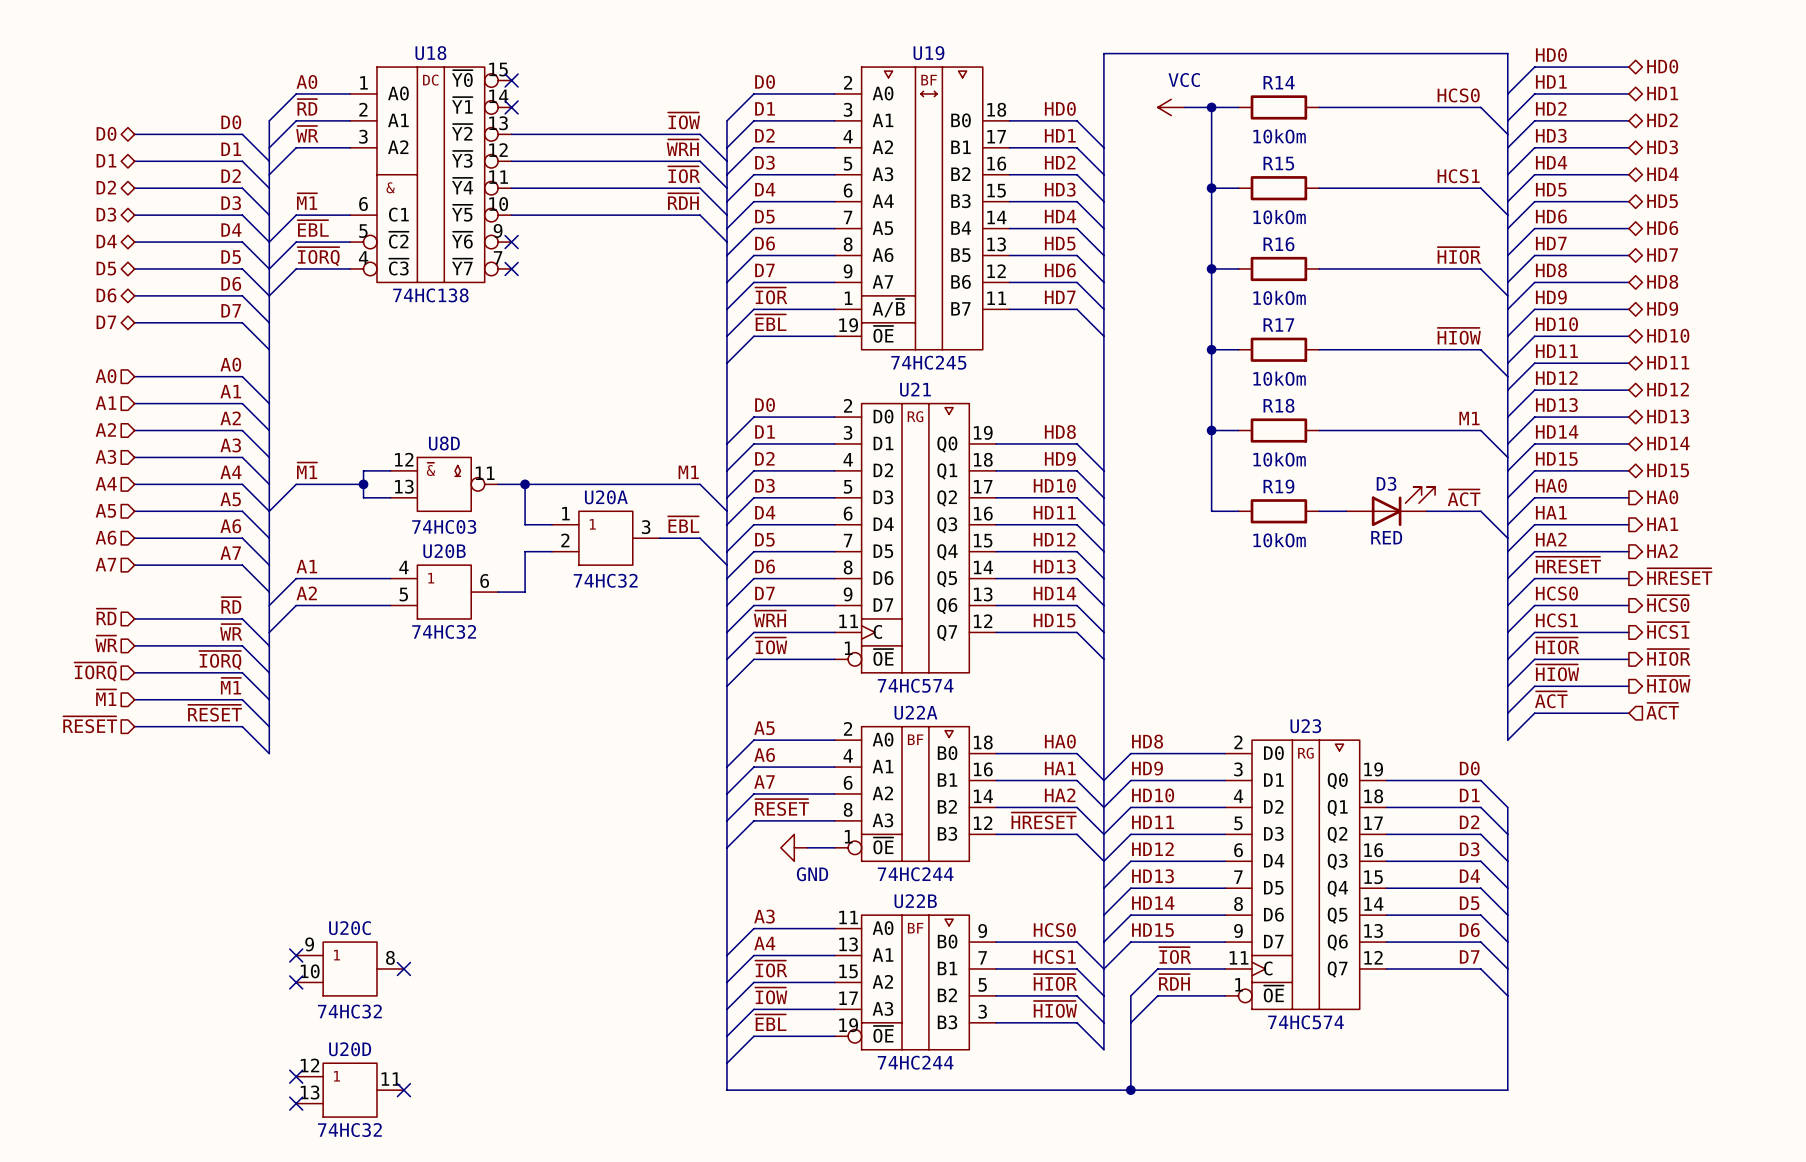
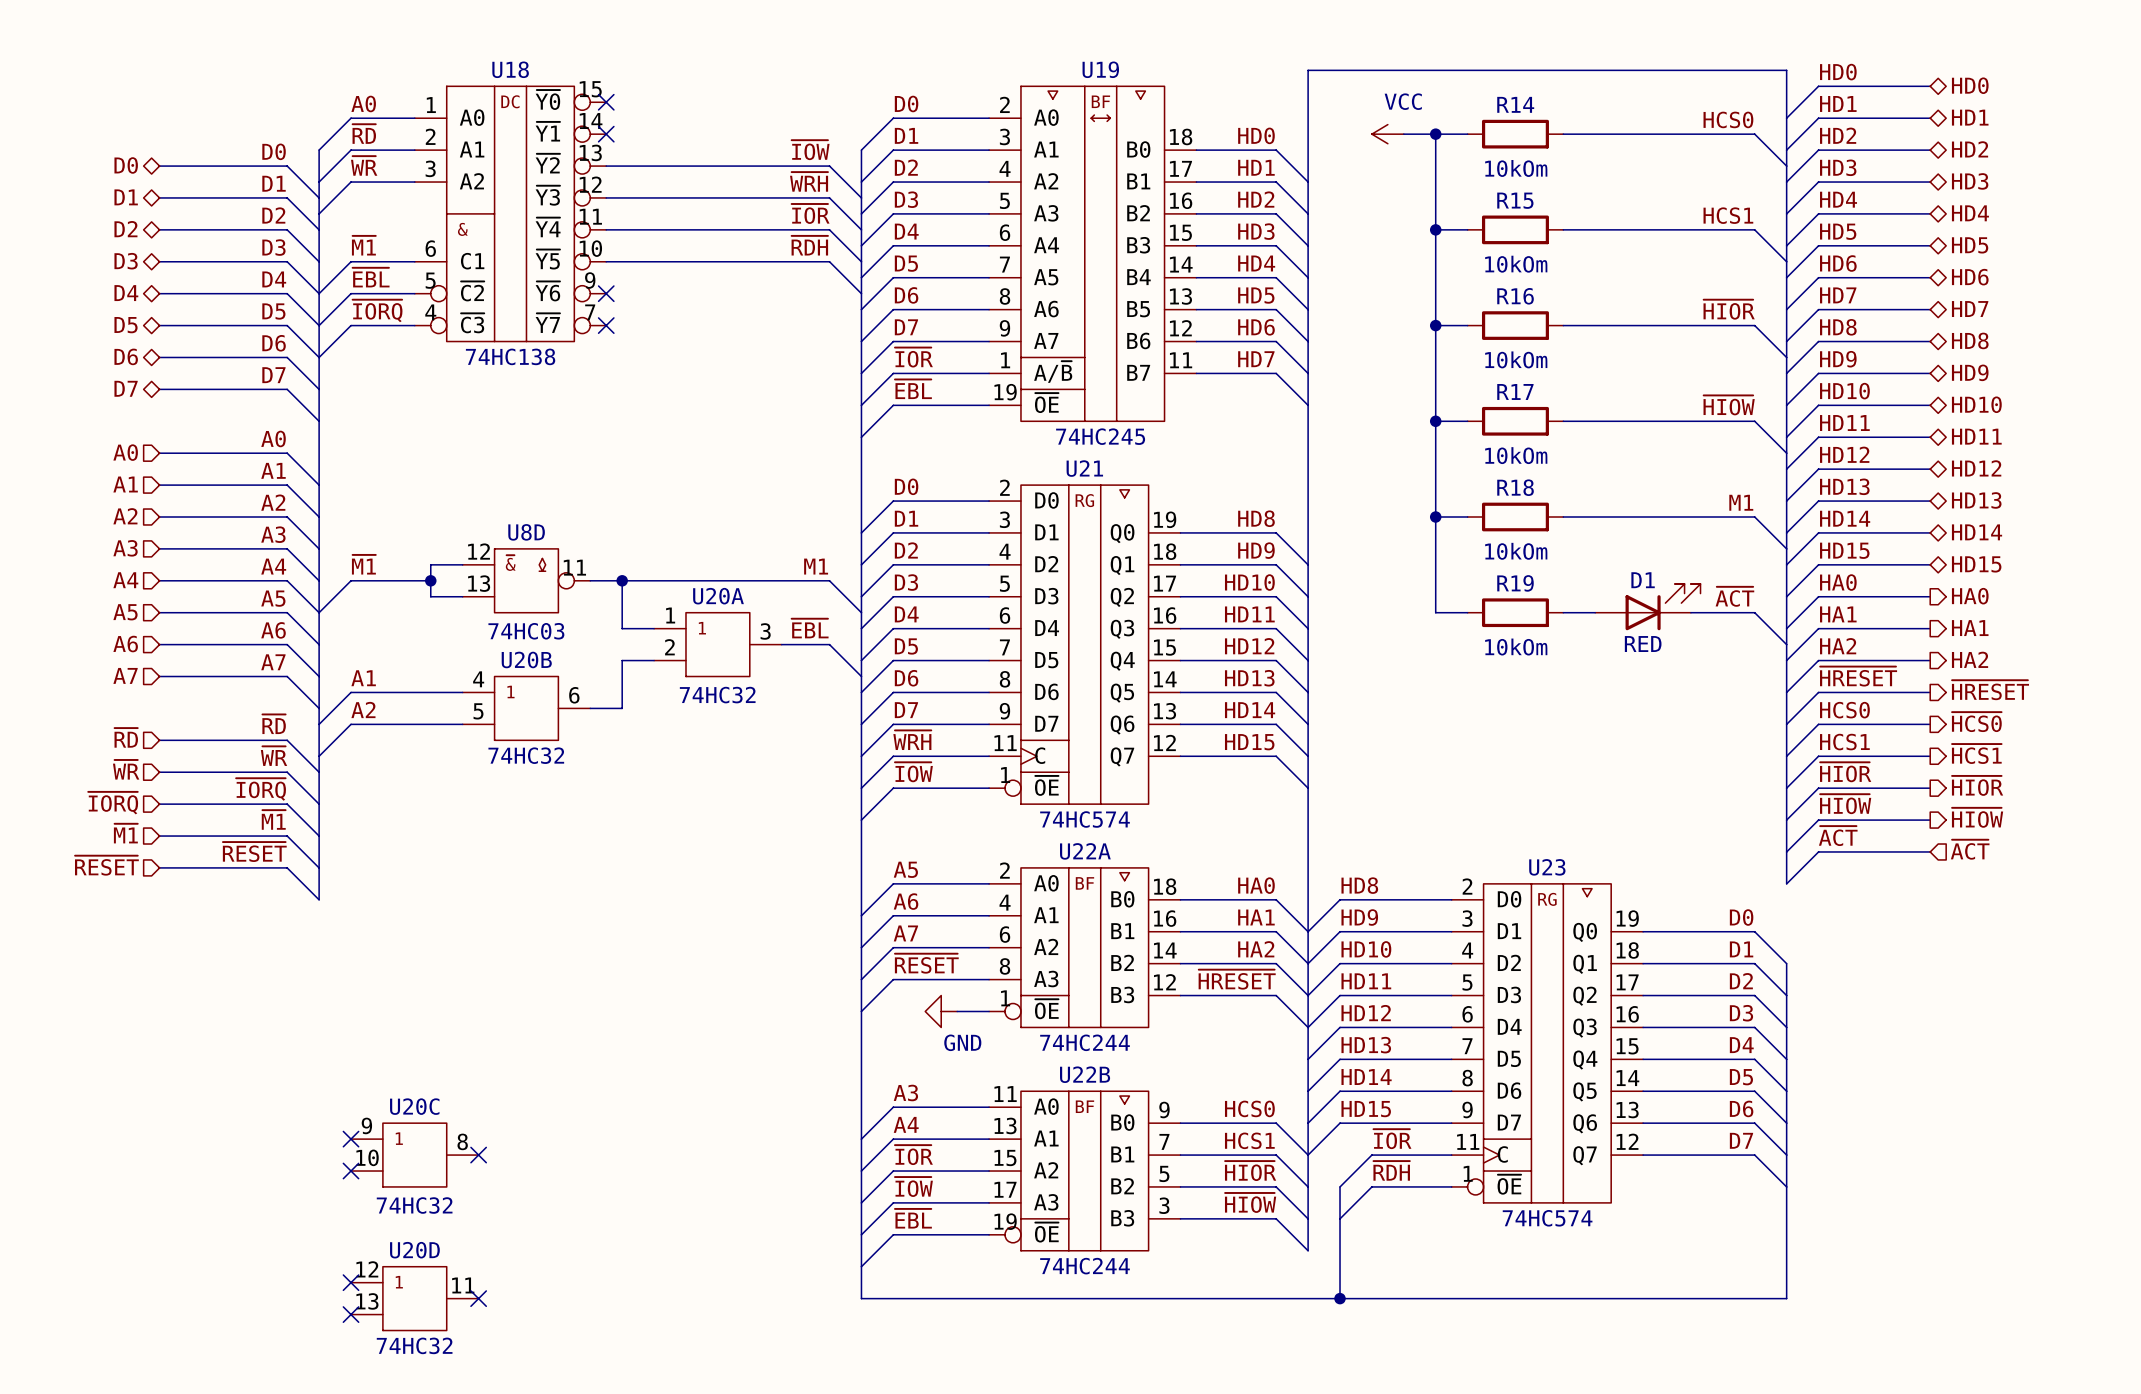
D3 name: D3 (1386, 483) -> D1 (1643, 580)

